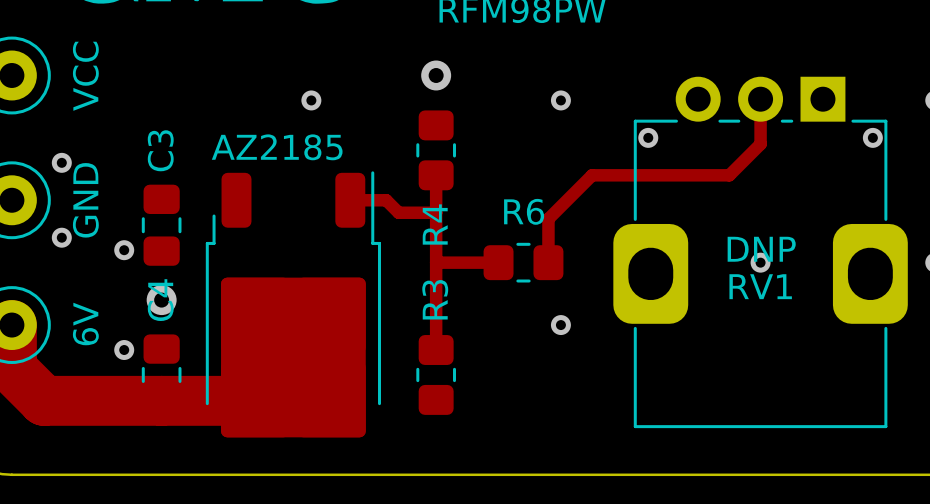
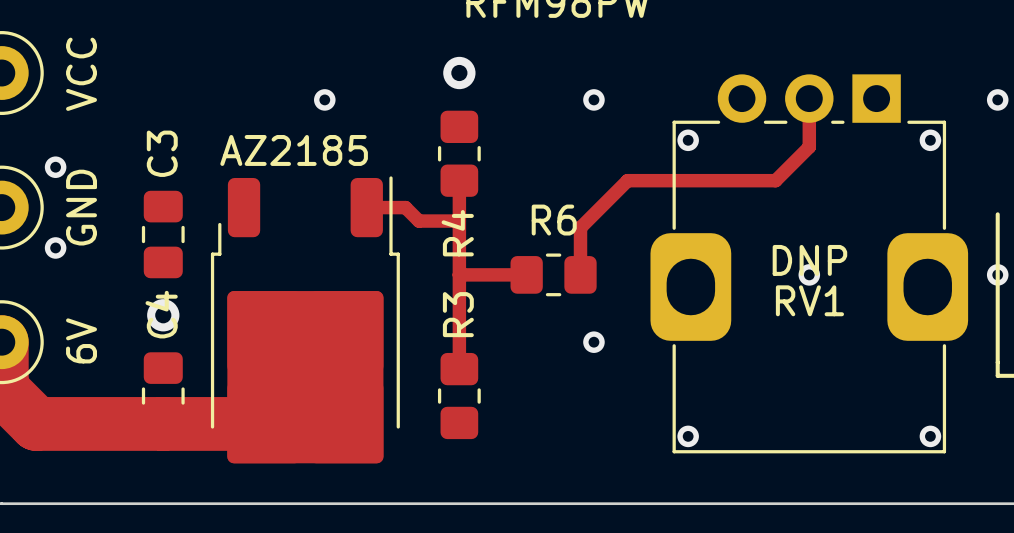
via: (124, 250) -> none
via: (124, 350) -> none
via: none -> (688, 436)
via: none -> (930, 436)

